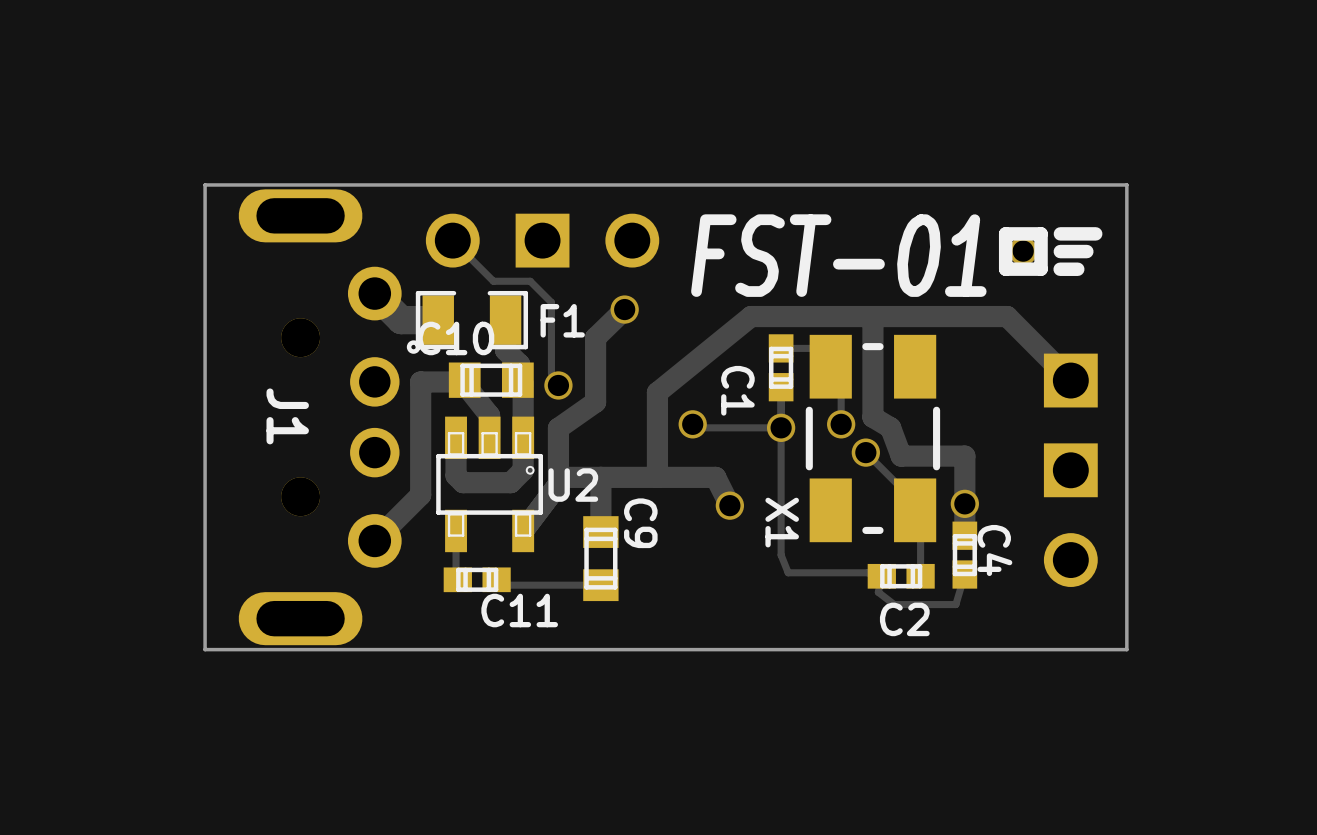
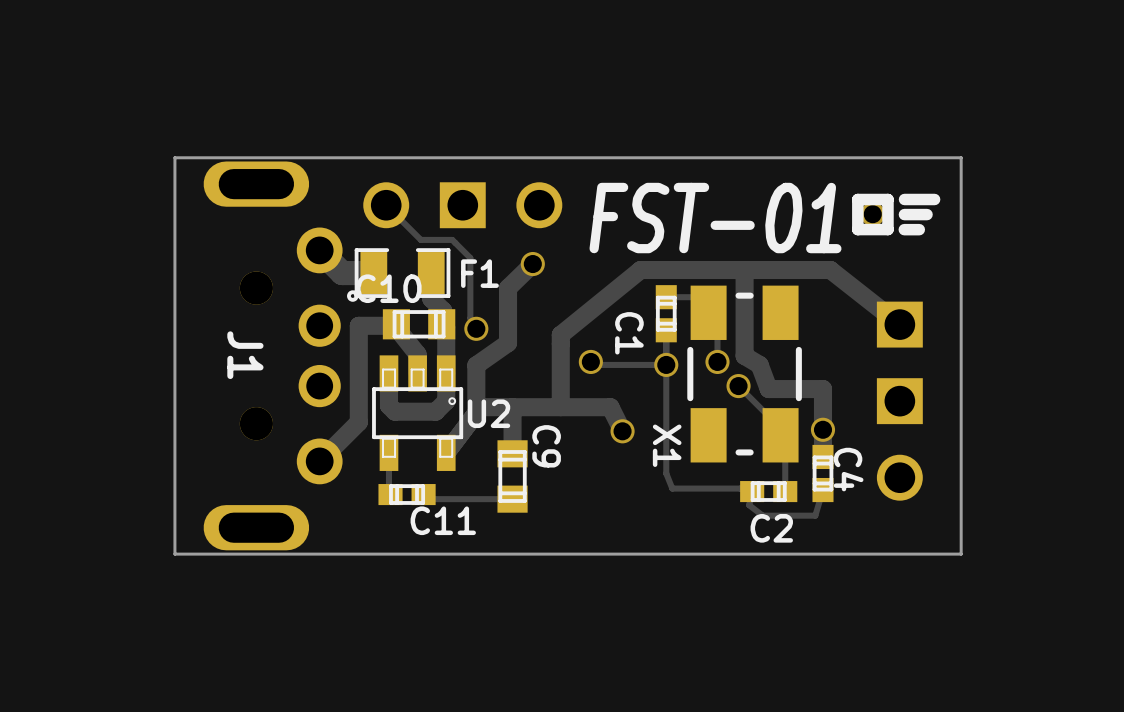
track: (973, 316) (1007, 316) (1070, 380) -> (830, 270) (899, 324)
part position: (1070, 470) -> (899, 401)

